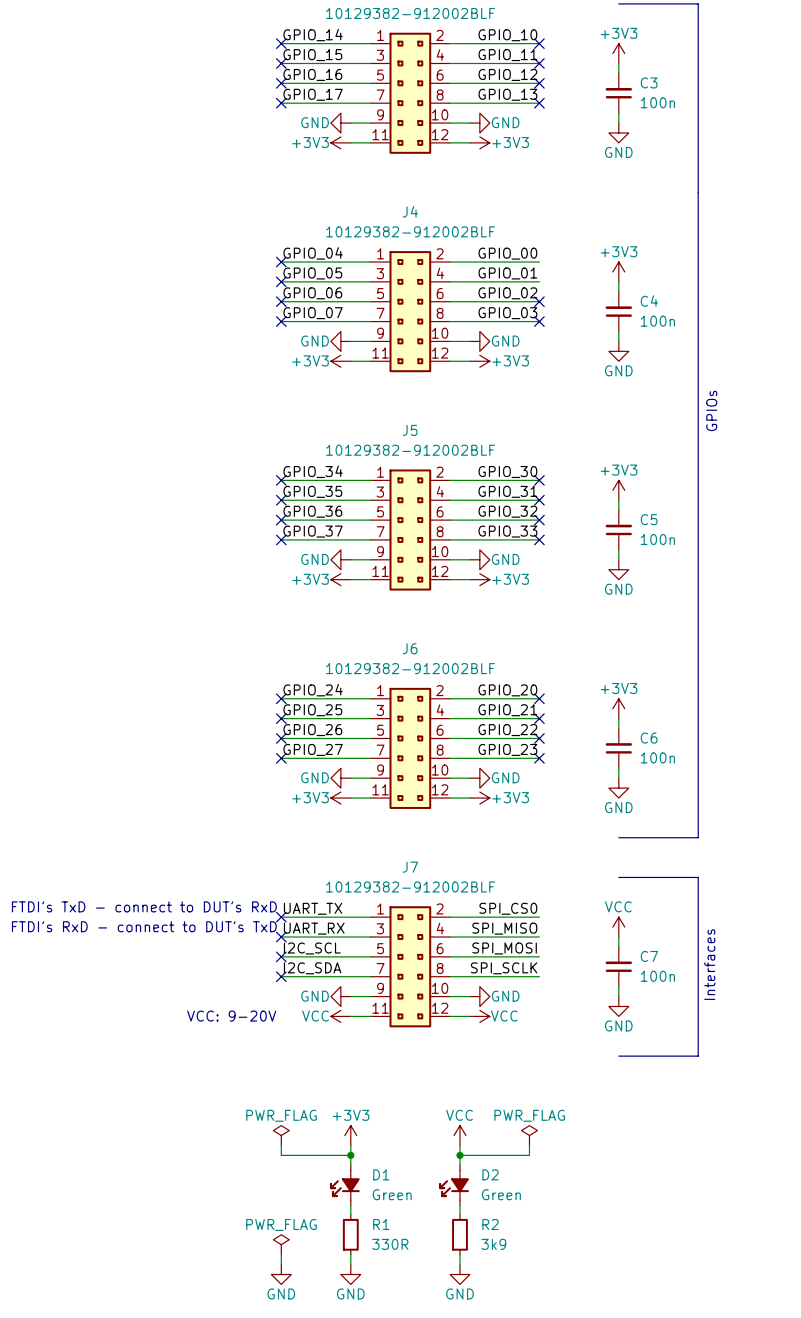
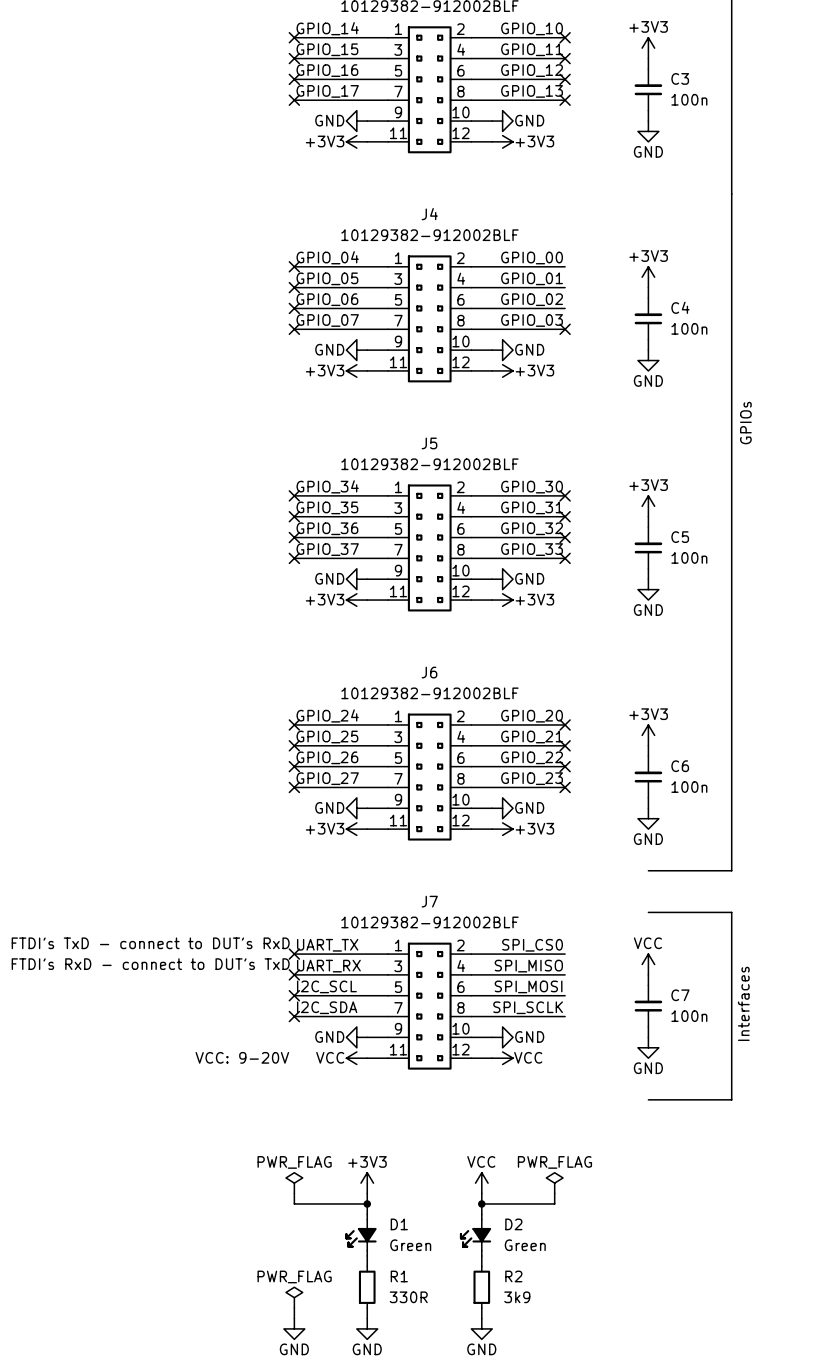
no-connect mark: (539, 301) -> none

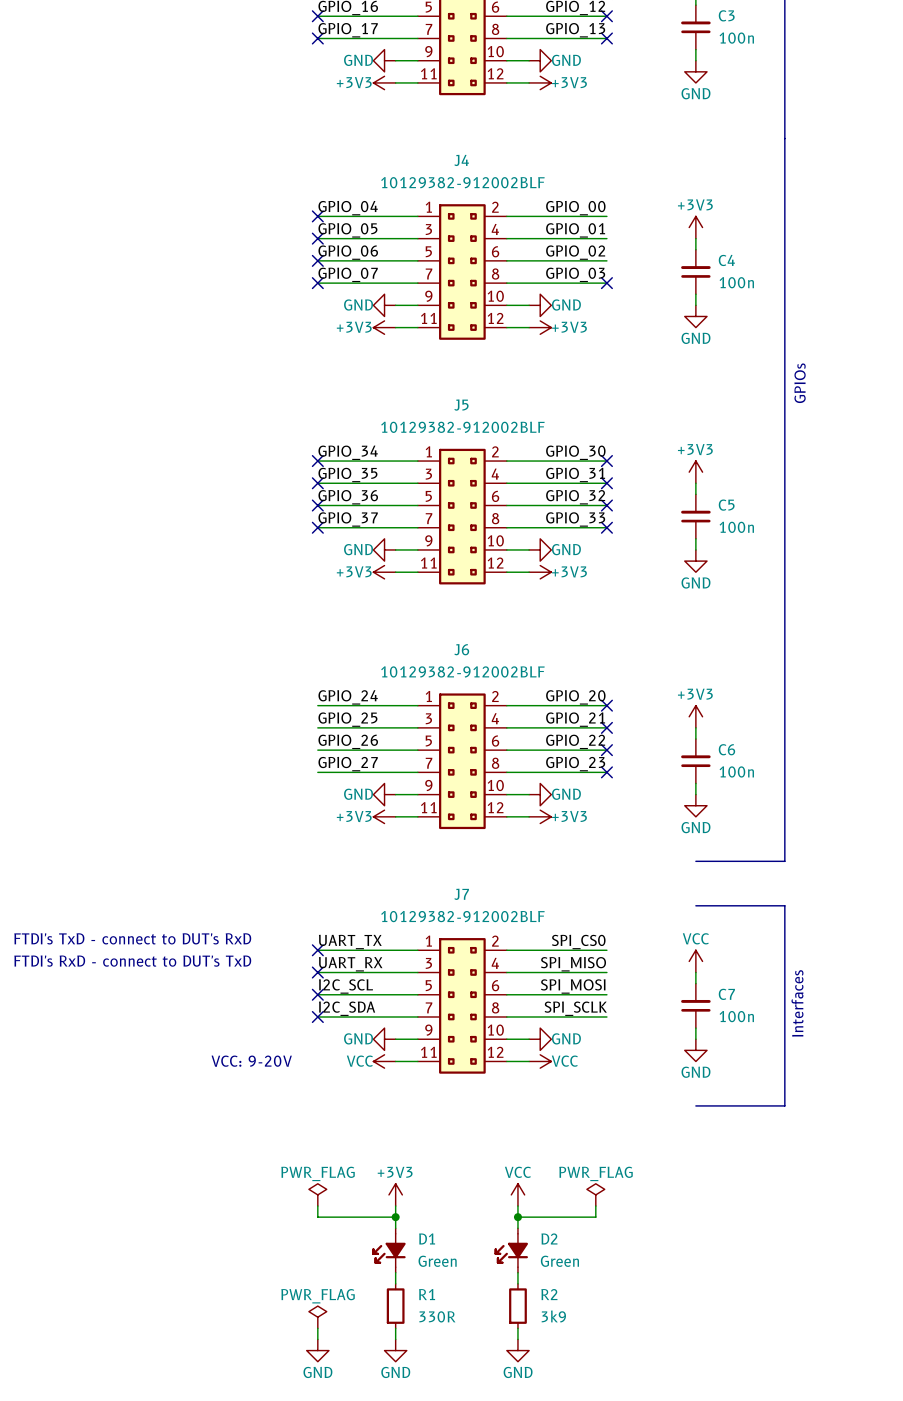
no-connect mark: (294, 724) -> none
no-connect mark: (294, 745) -> none
no-connect mark: (294, 766) -> none
no-connect mark: (294, 787) -> none

